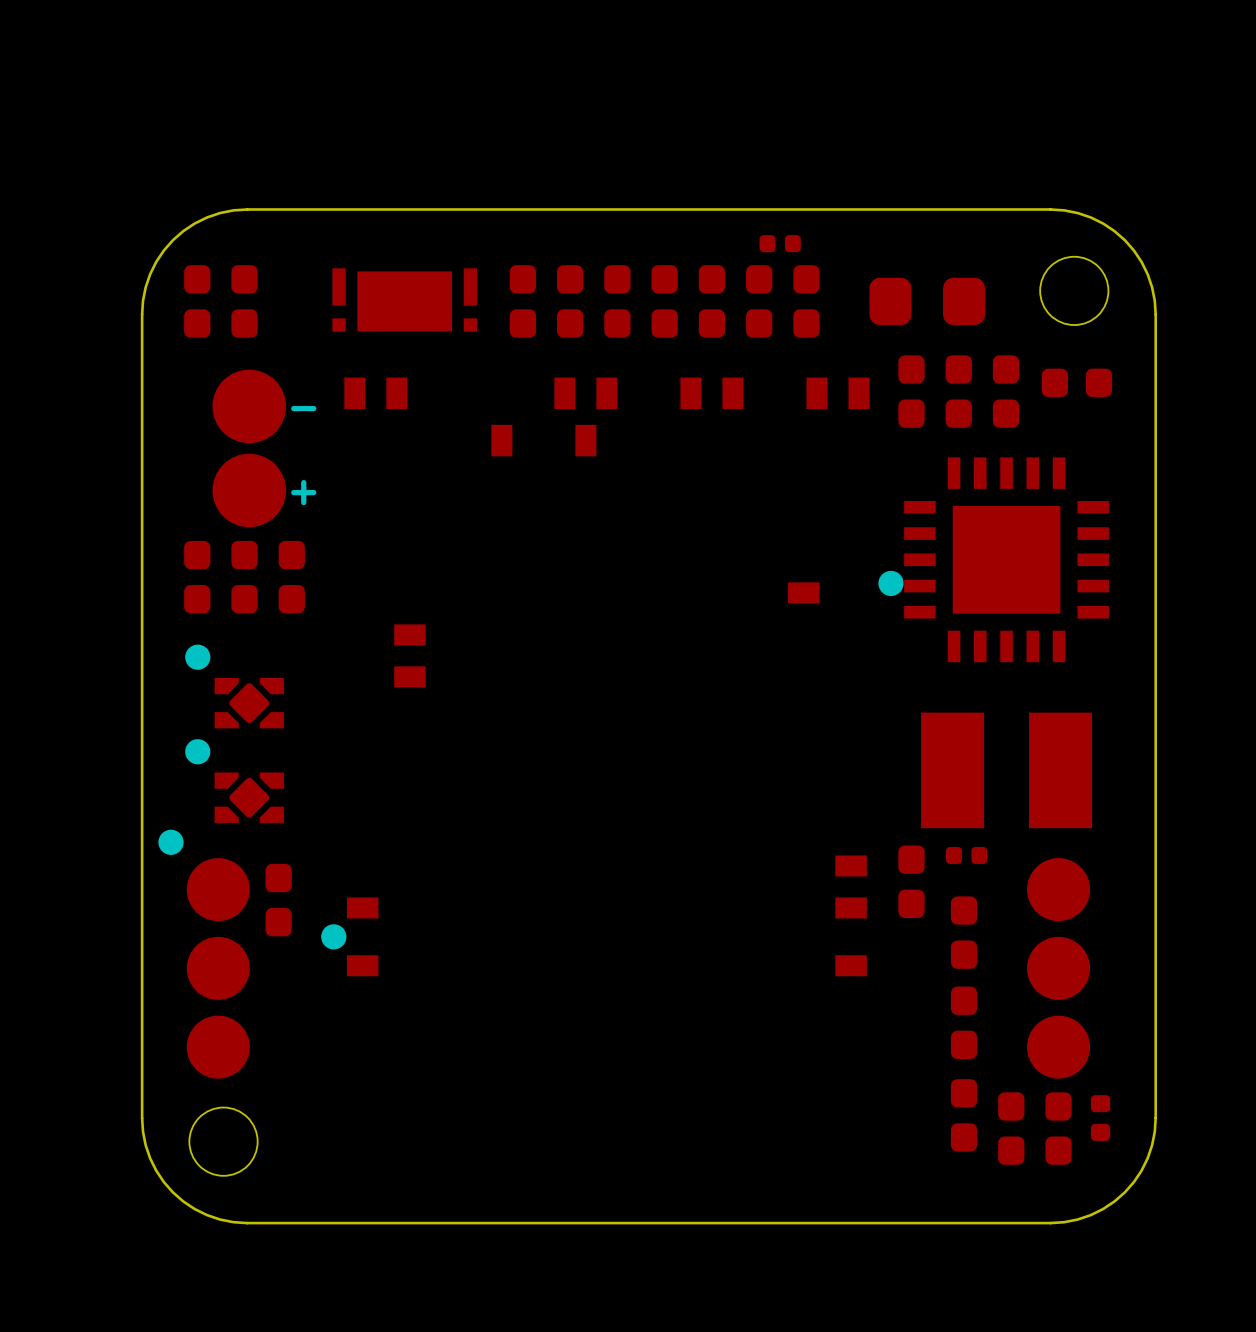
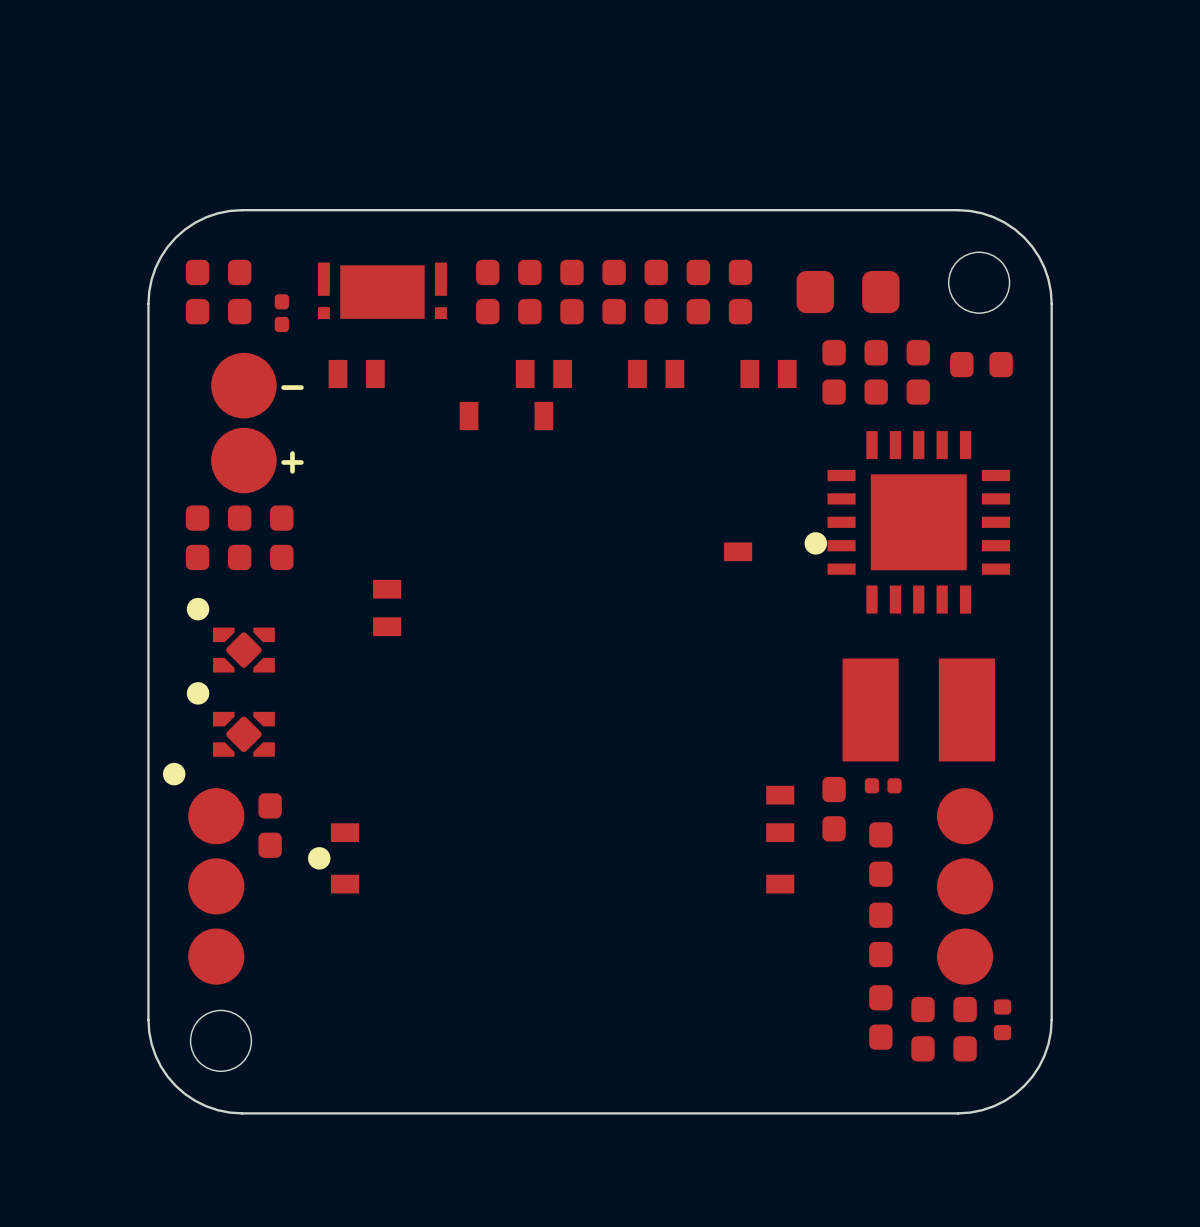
part rotation: 0° (780, 243) -> 90° clockwise (281, 313)
part position: (780, 243) -> (281, 313)

